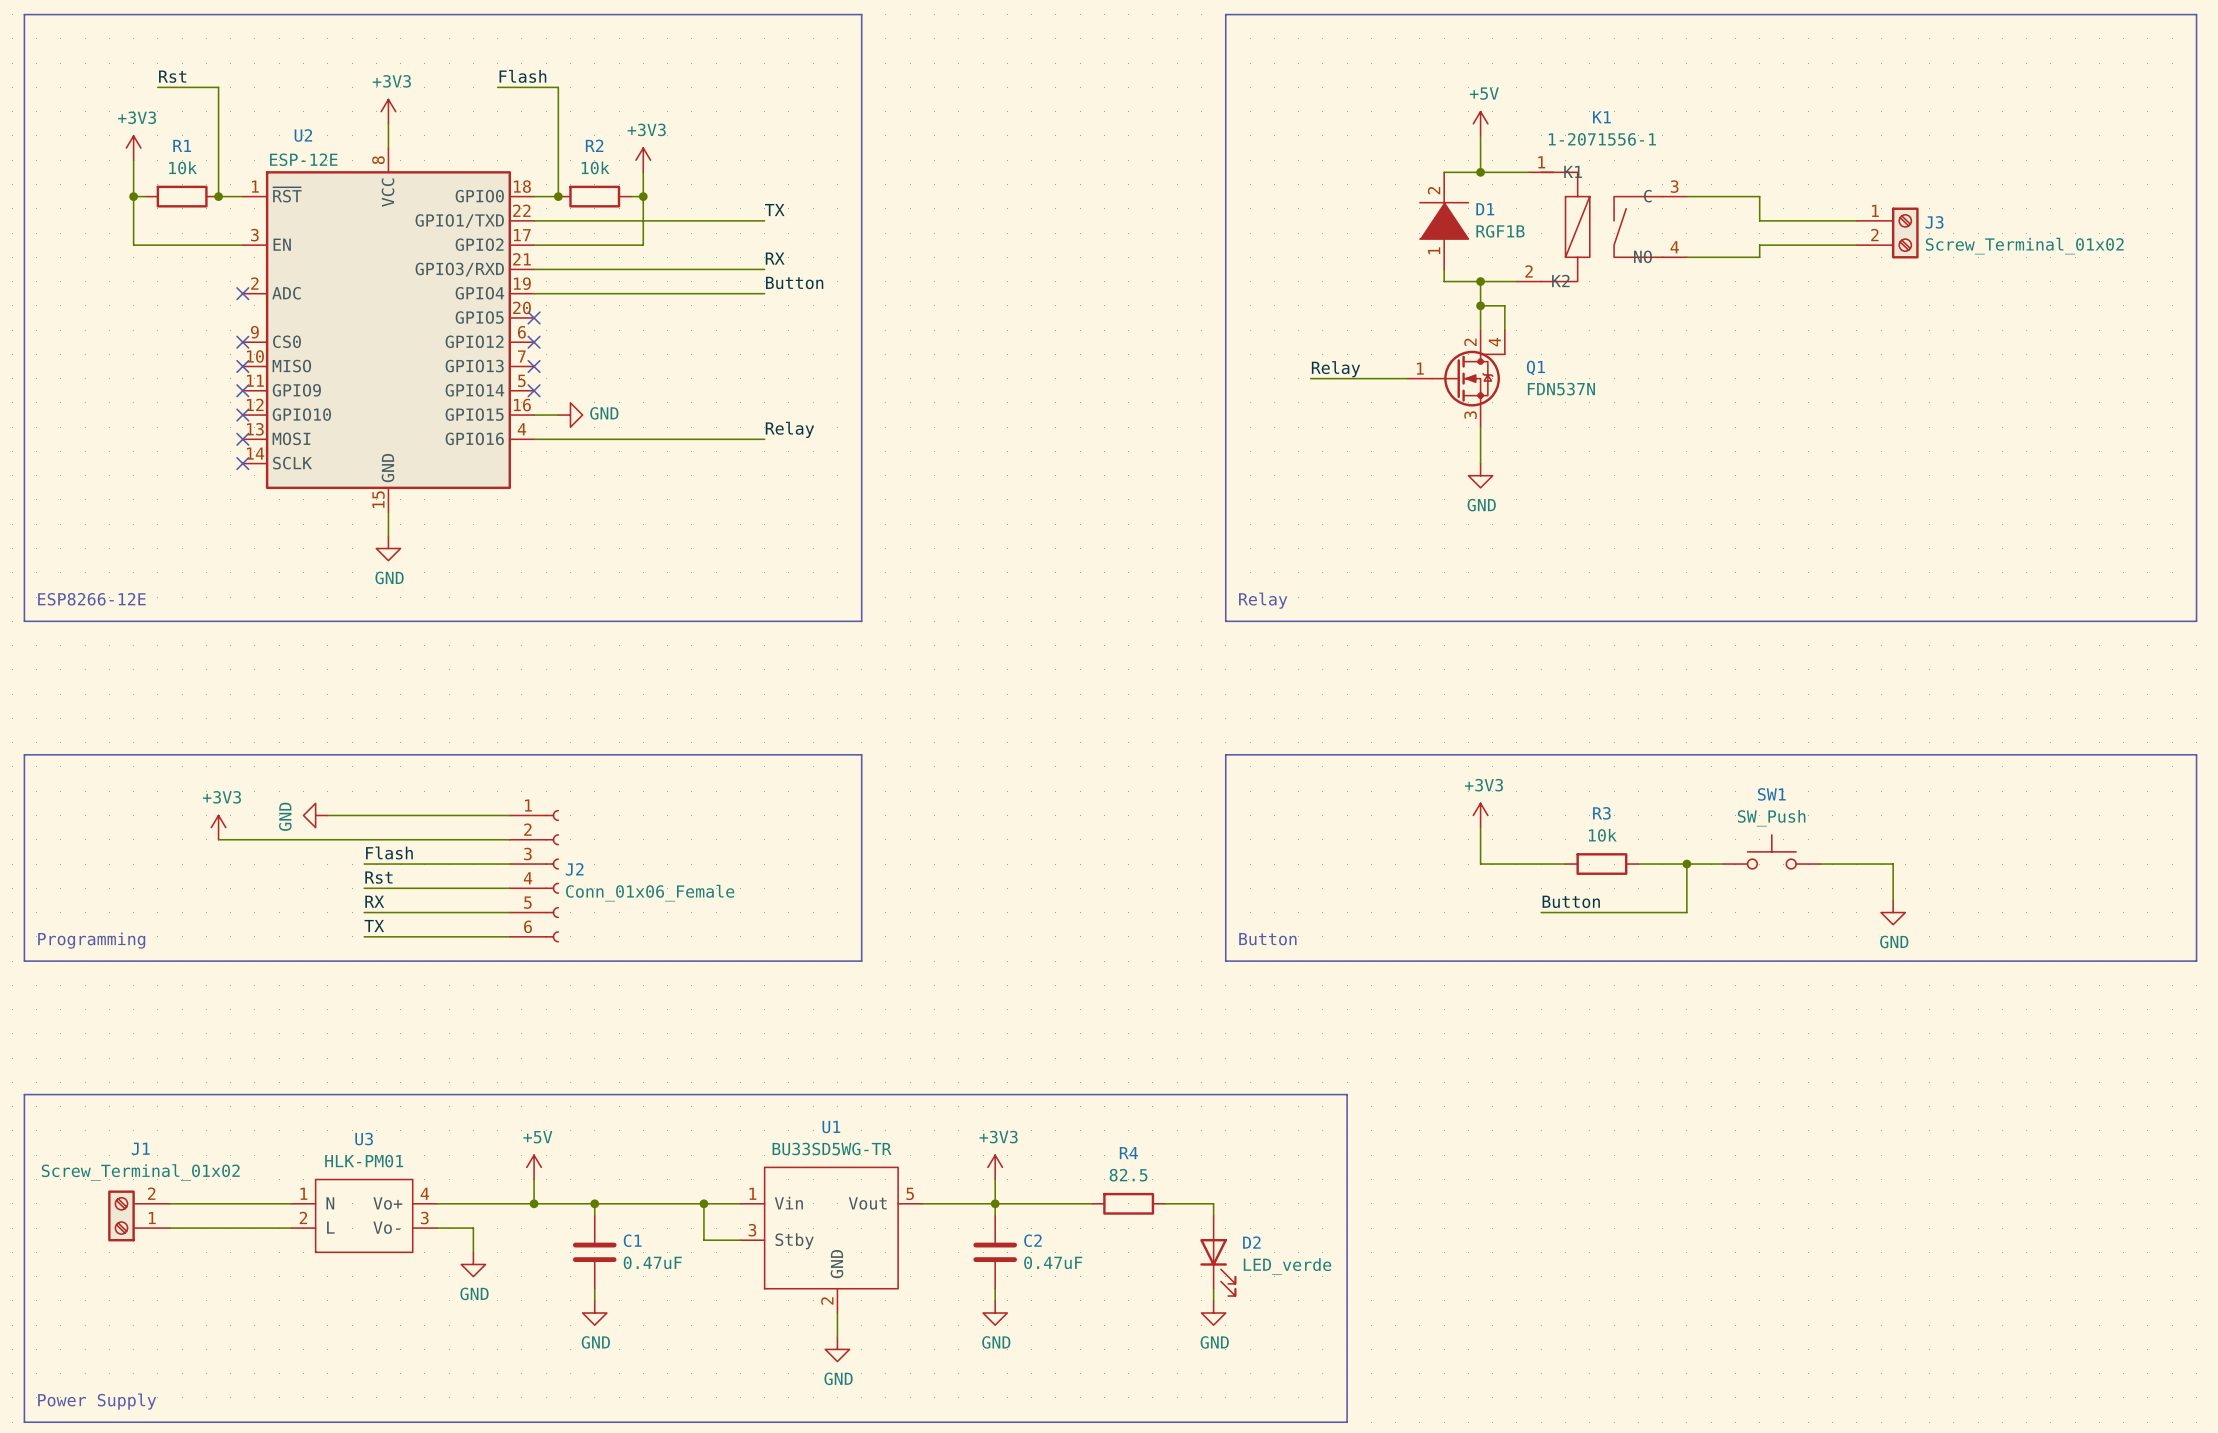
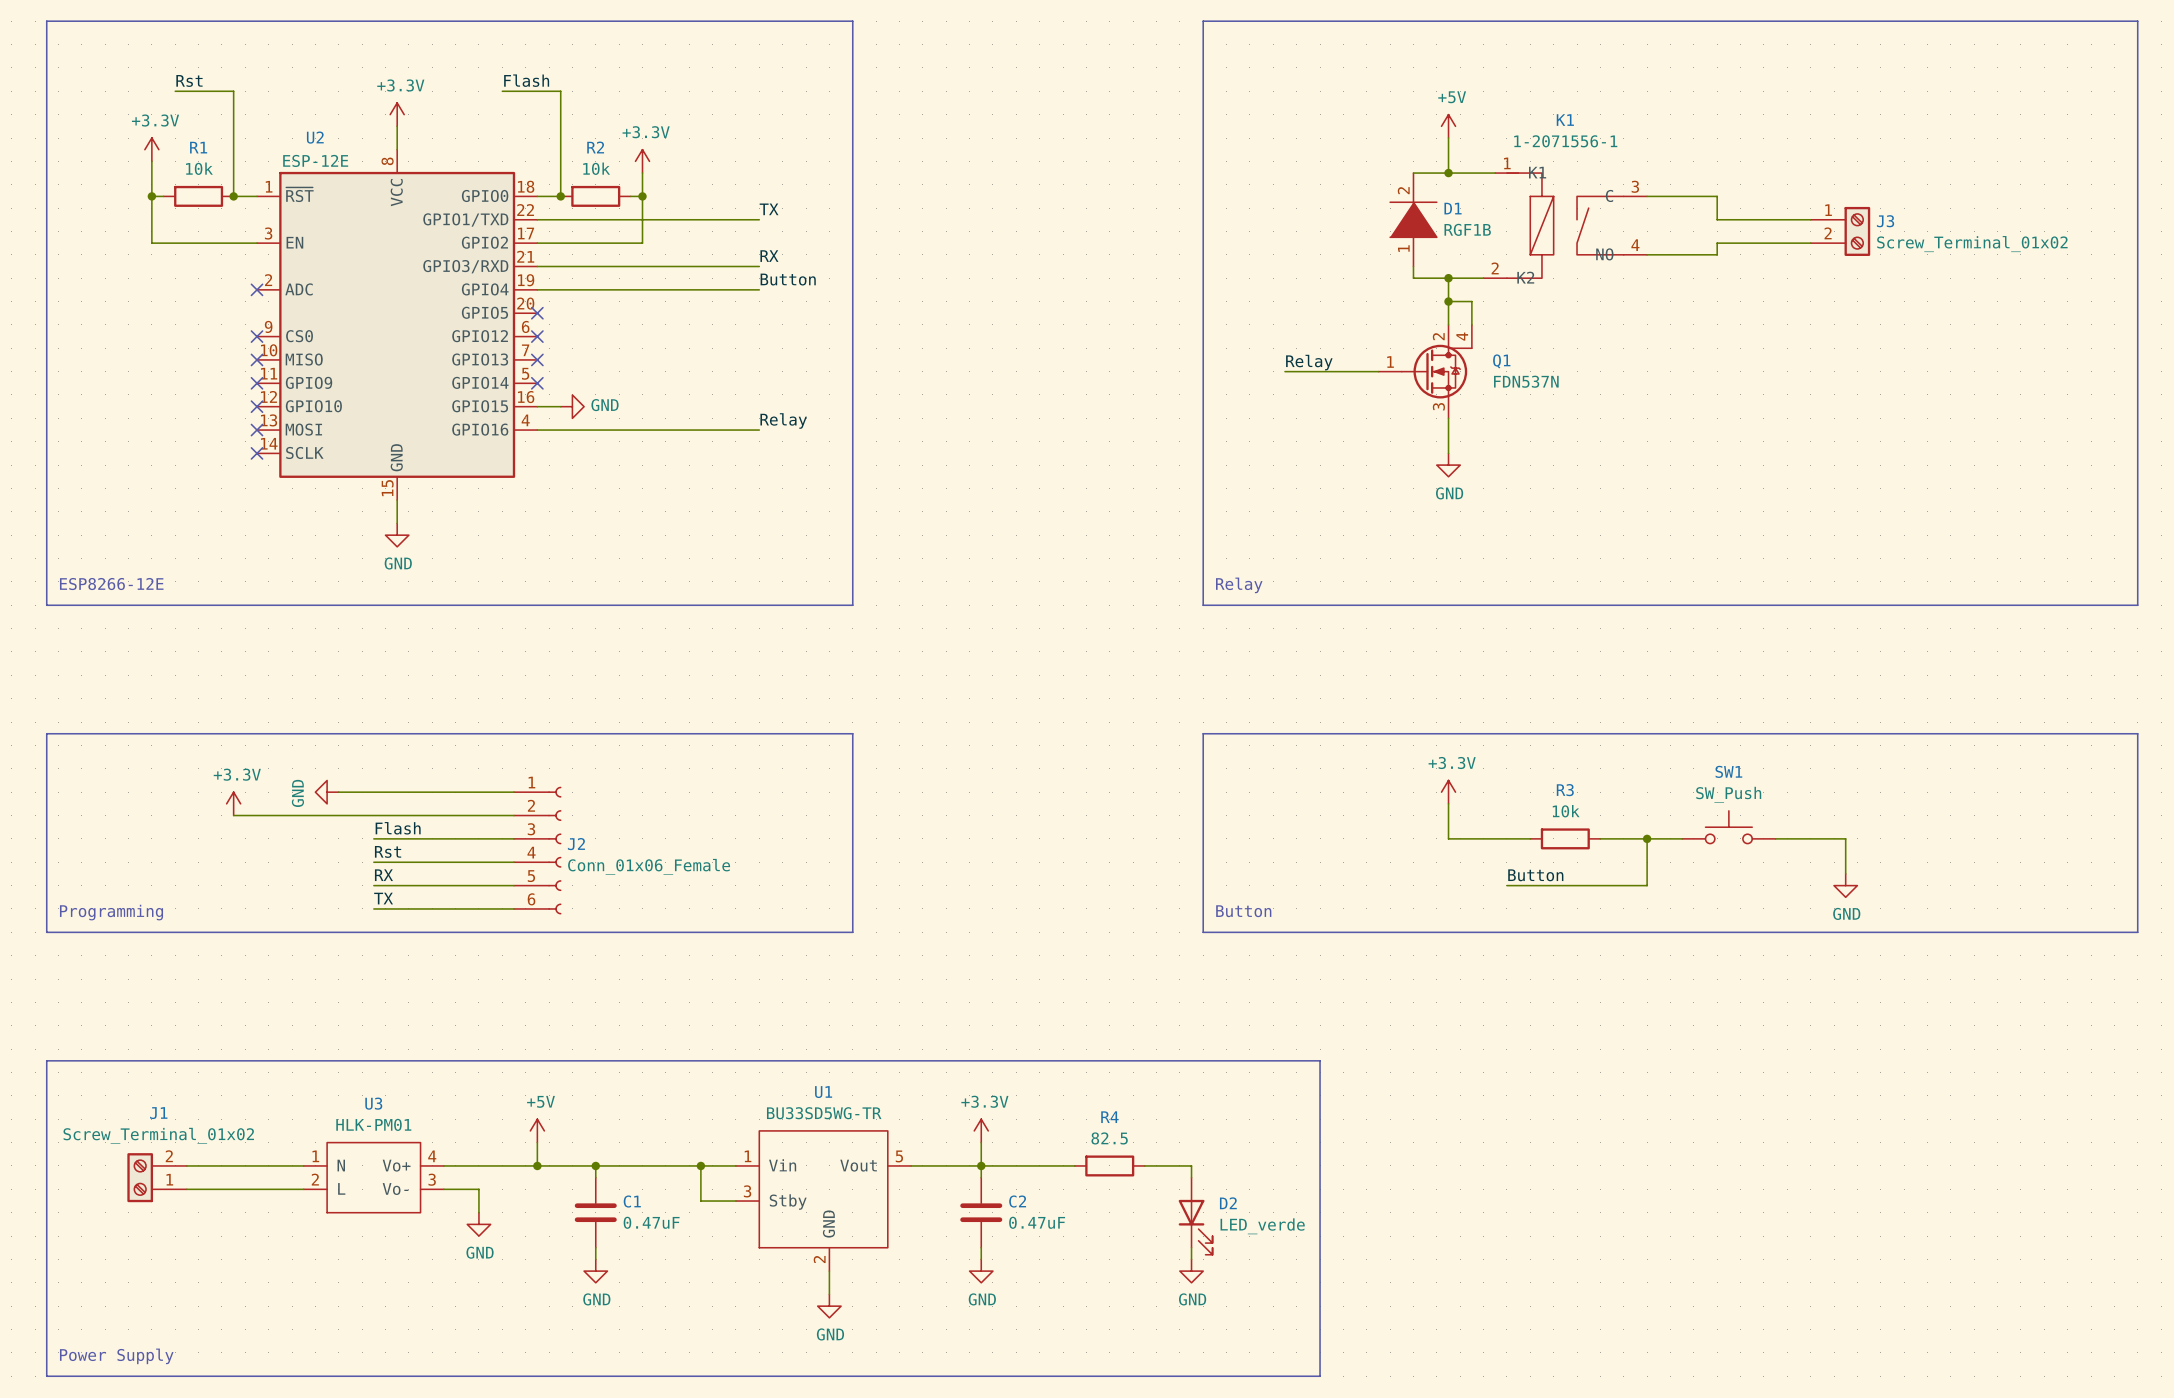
power symbol: +3V3 (388, 111) -> +3.3V (397, 114)
power symbol: +3V3 (133, 148) -> +3.3V (151, 149)
power symbol: +3V3 (643, 160) -> +3.3V (642, 161)
power symbol: +3V3 (1480, 815) -> +3.3V (1448, 792)
power symbol: +3V3 (218, 827) -> +3.3V (233, 803)
power symbol: +3V3 (995, 1167) -> +3.3V (981, 1130)

